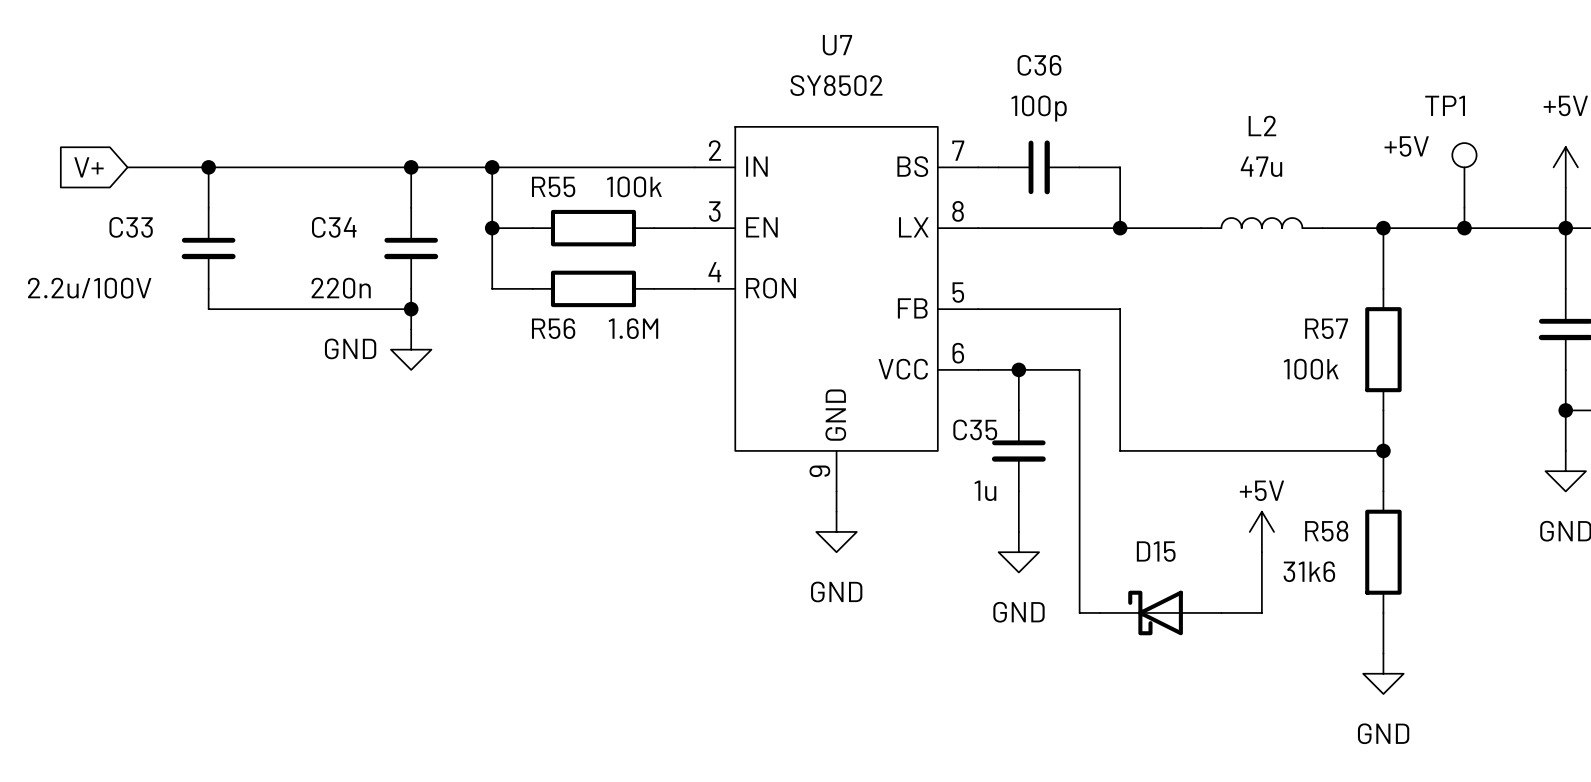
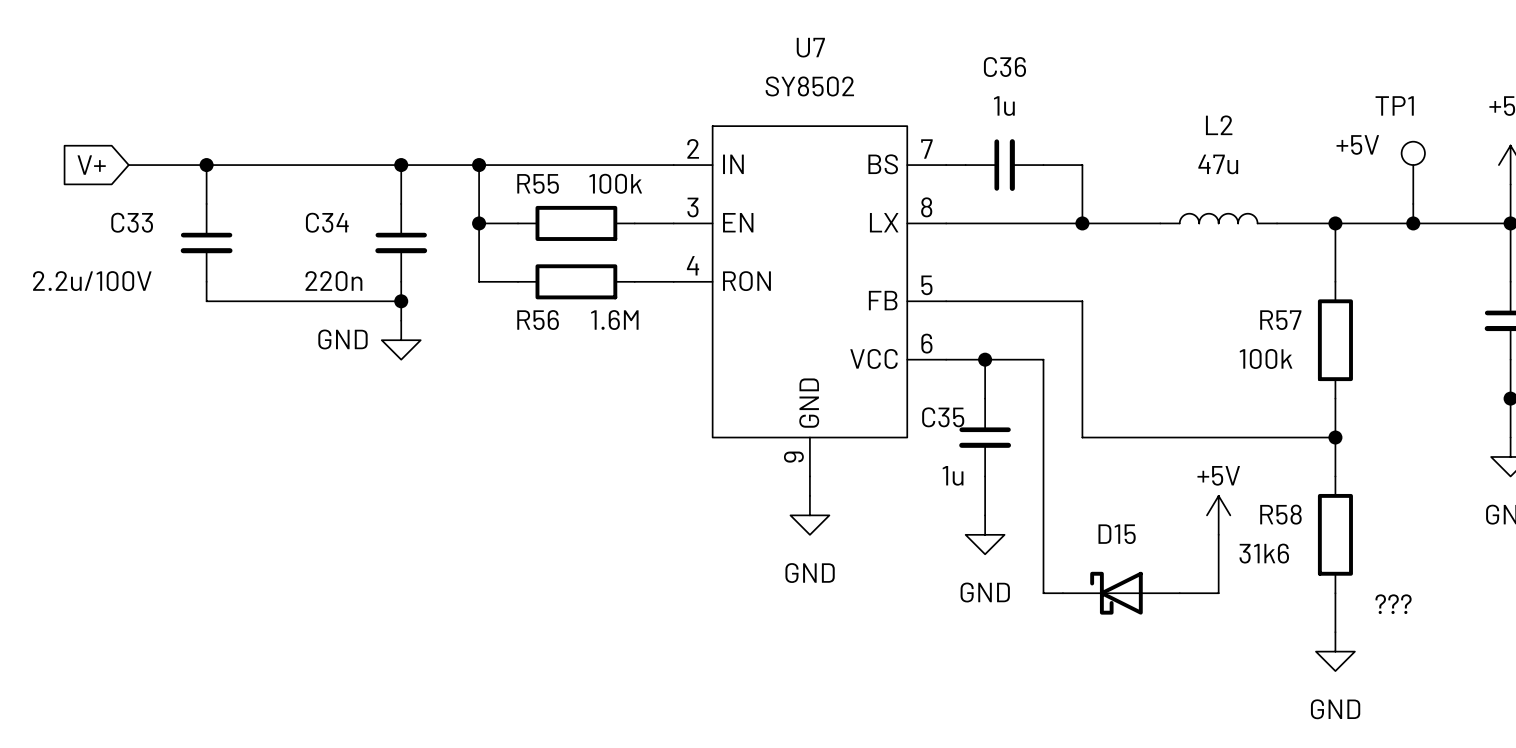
C36 value: 100p (1039, 108) -> 1u (1004, 106)
text: none -> ??? (1393, 604)

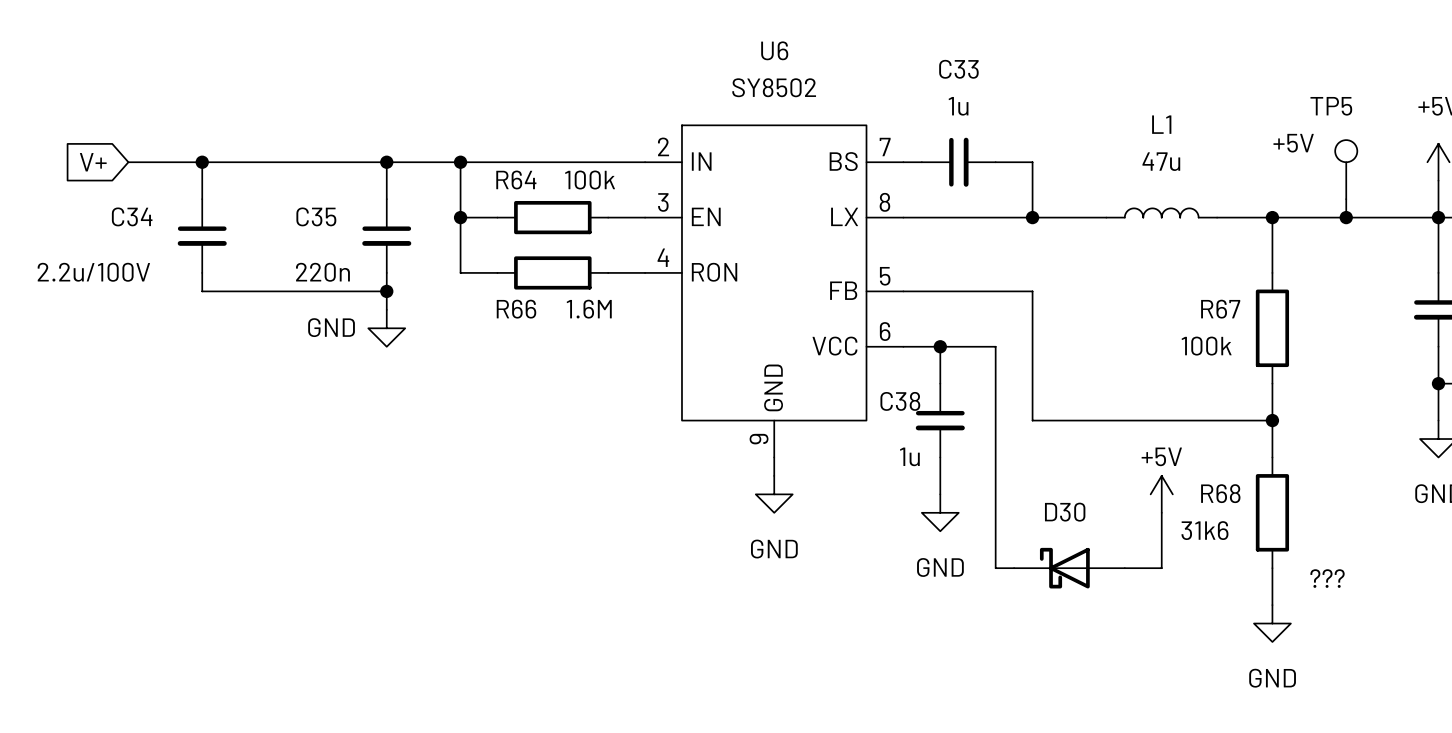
U7 name: U7 (810, 47) -> U6 (774, 50)
C36 name: C36 (1004, 67) -> C33 (958, 69)
TP1 name: TP1 (1394, 105) -> TP5 (1331, 106)
L2 name: L2 (1219, 125) -> L1 (1161, 124)
R55 name: R55 (538, 183) -> R64 (516, 179)
C33 name: C33 (132, 222) -> C34 (132, 216)
C34 name: C34 (327, 222) -> C35 (316, 216)
R56 name: R56 (538, 320) -> R66 (516, 309)
R57 name: R57 (1280, 320) -> R67 (1220, 309)
C35 name: C35 (943, 417) -> C38 (900, 401)
R58 name: R58 (1280, 514) -> R68 (1220, 493)
D15 name: D15 (1117, 534) -> D30 (1065, 512)

